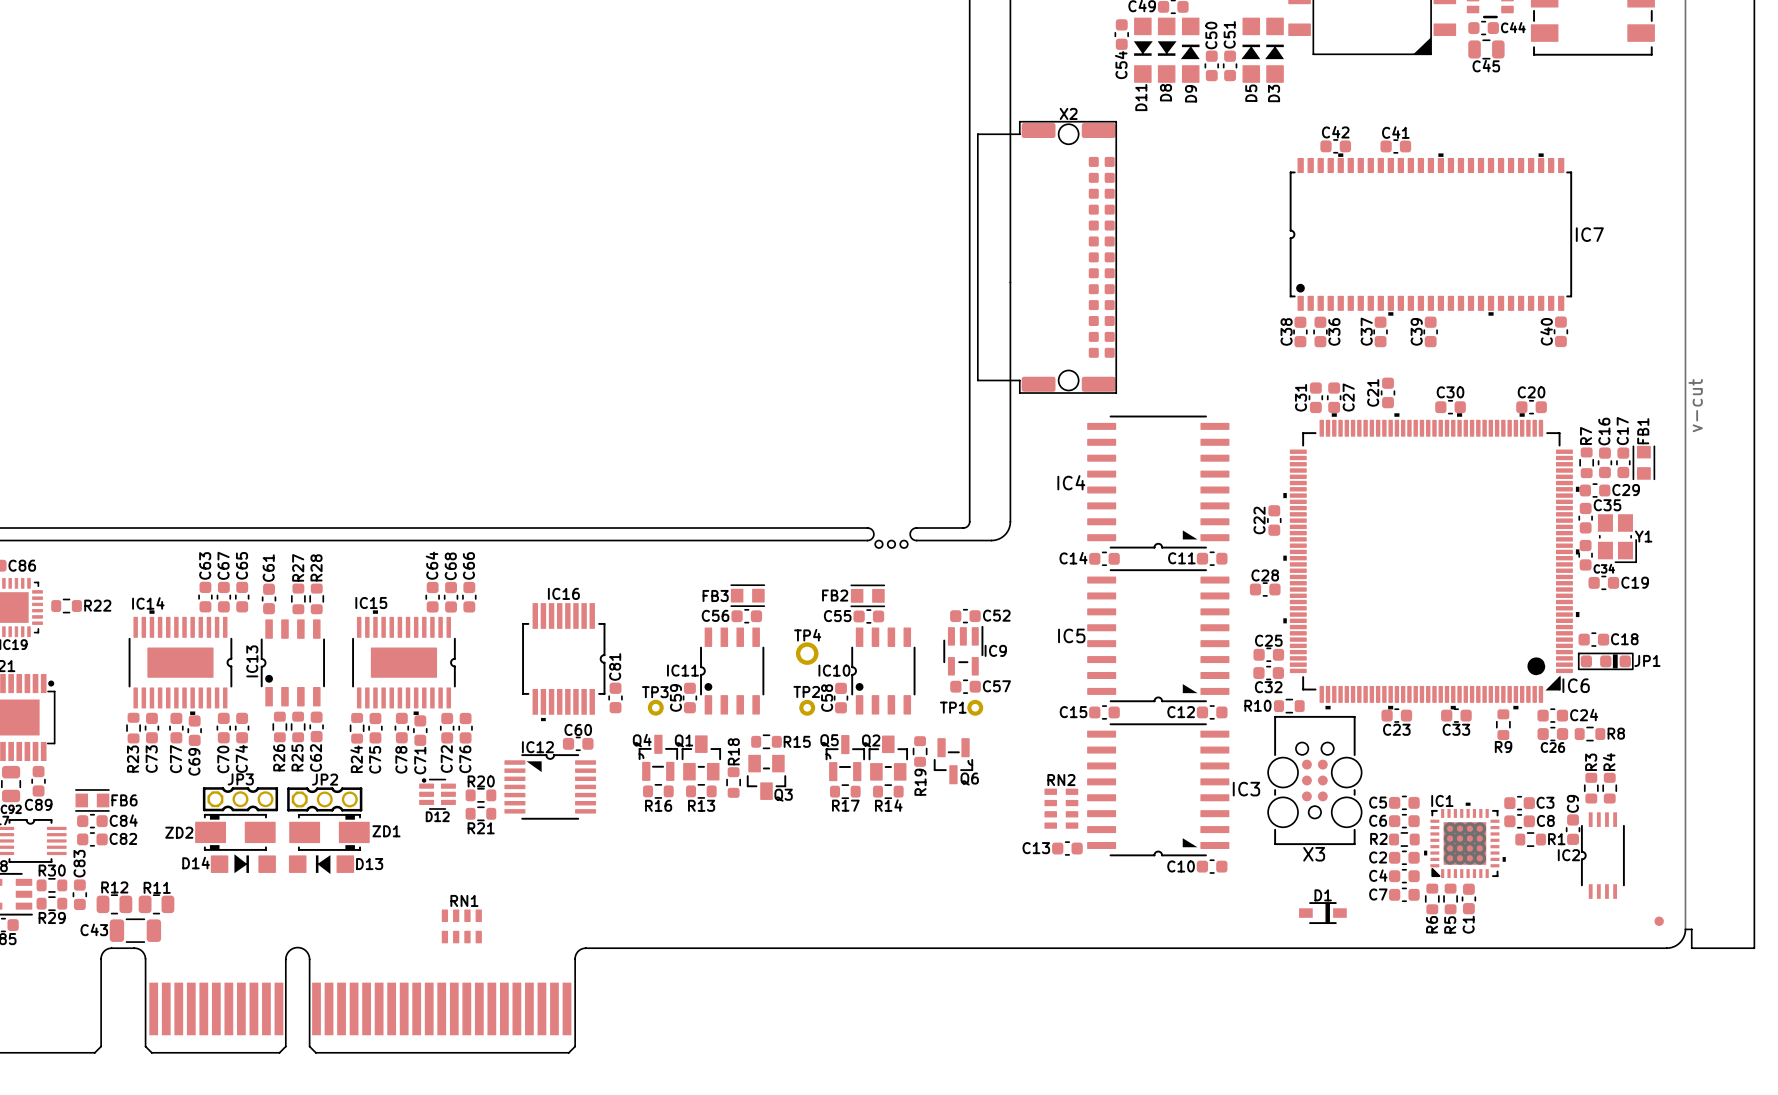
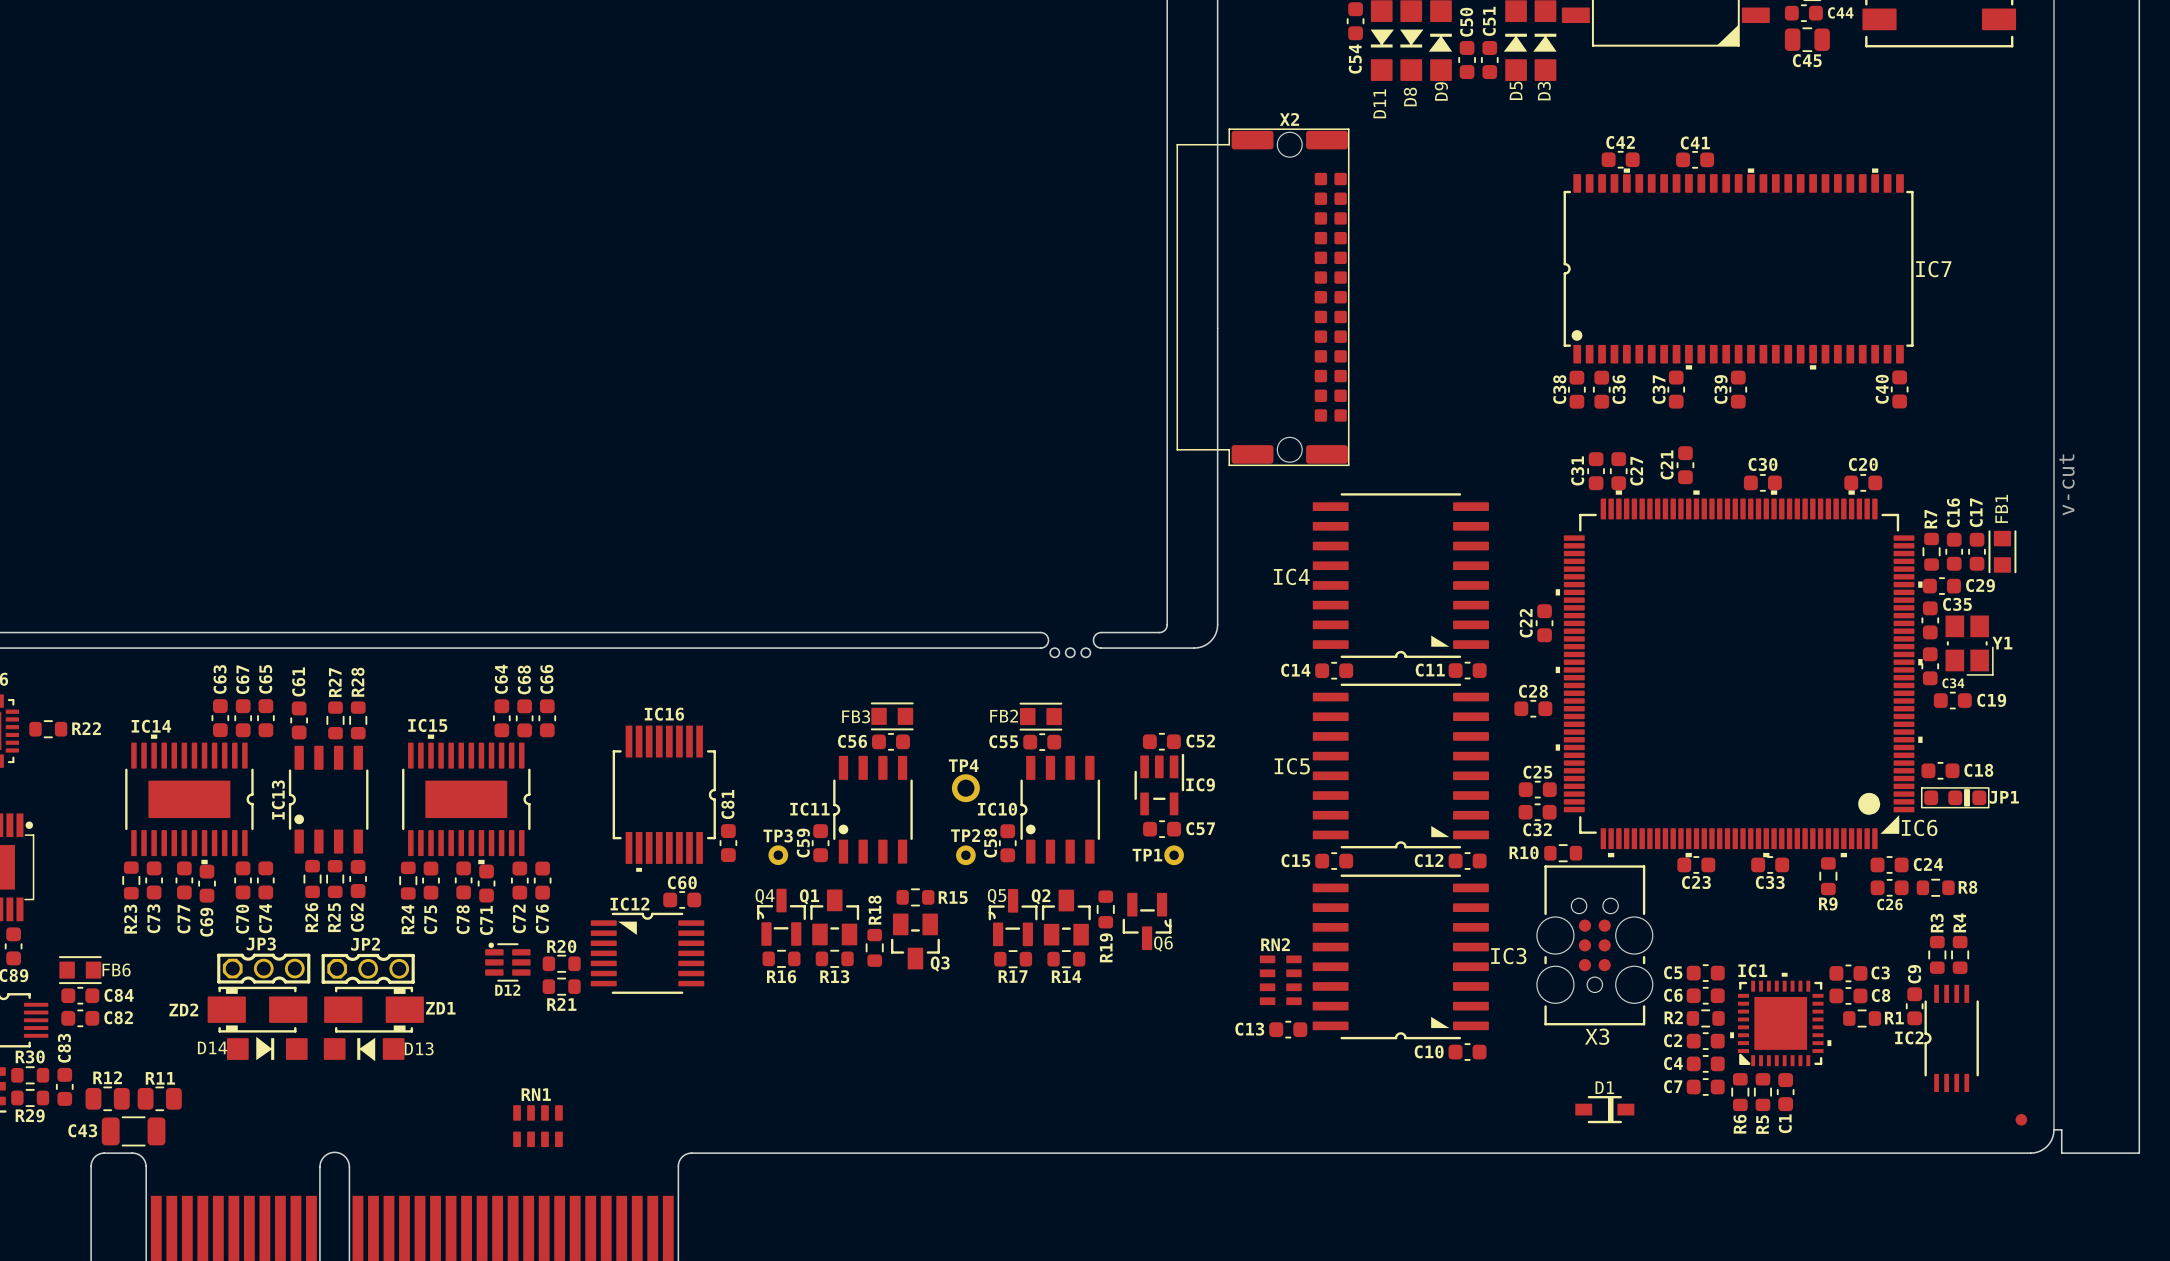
IC1 footprint: [1424, 802, 1506, 879] -> [1730, 972, 1832, 1067]

